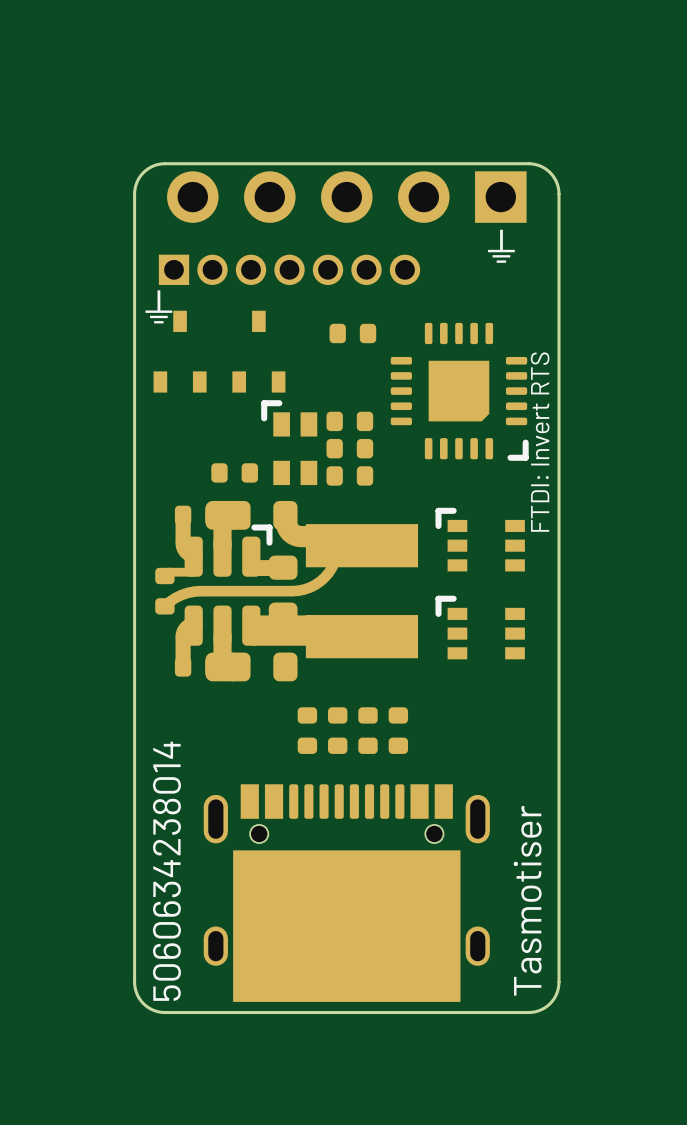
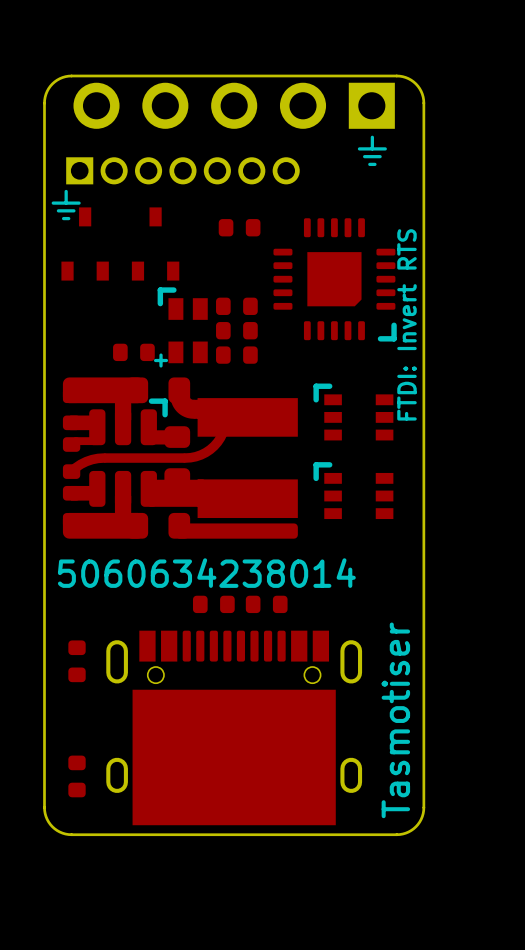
part footprint: [261, 400, 318, 486] -> [153, 287, 208, 368]
part footprint: [155, 500, 419, 682] -> [62, 377, 298, 539]
part: (307, 730) -> none
part: (337, 730) -> none
part: (368, 730) -> none
part: (398, 730) -> none
part: none -> (213, 604)
part: none -> (266, 604)
part: none -> (77, 661)
text rotation: 0° (166, 871) -> 90° clockwise (206, 573)
part: none -> (77, 776)

